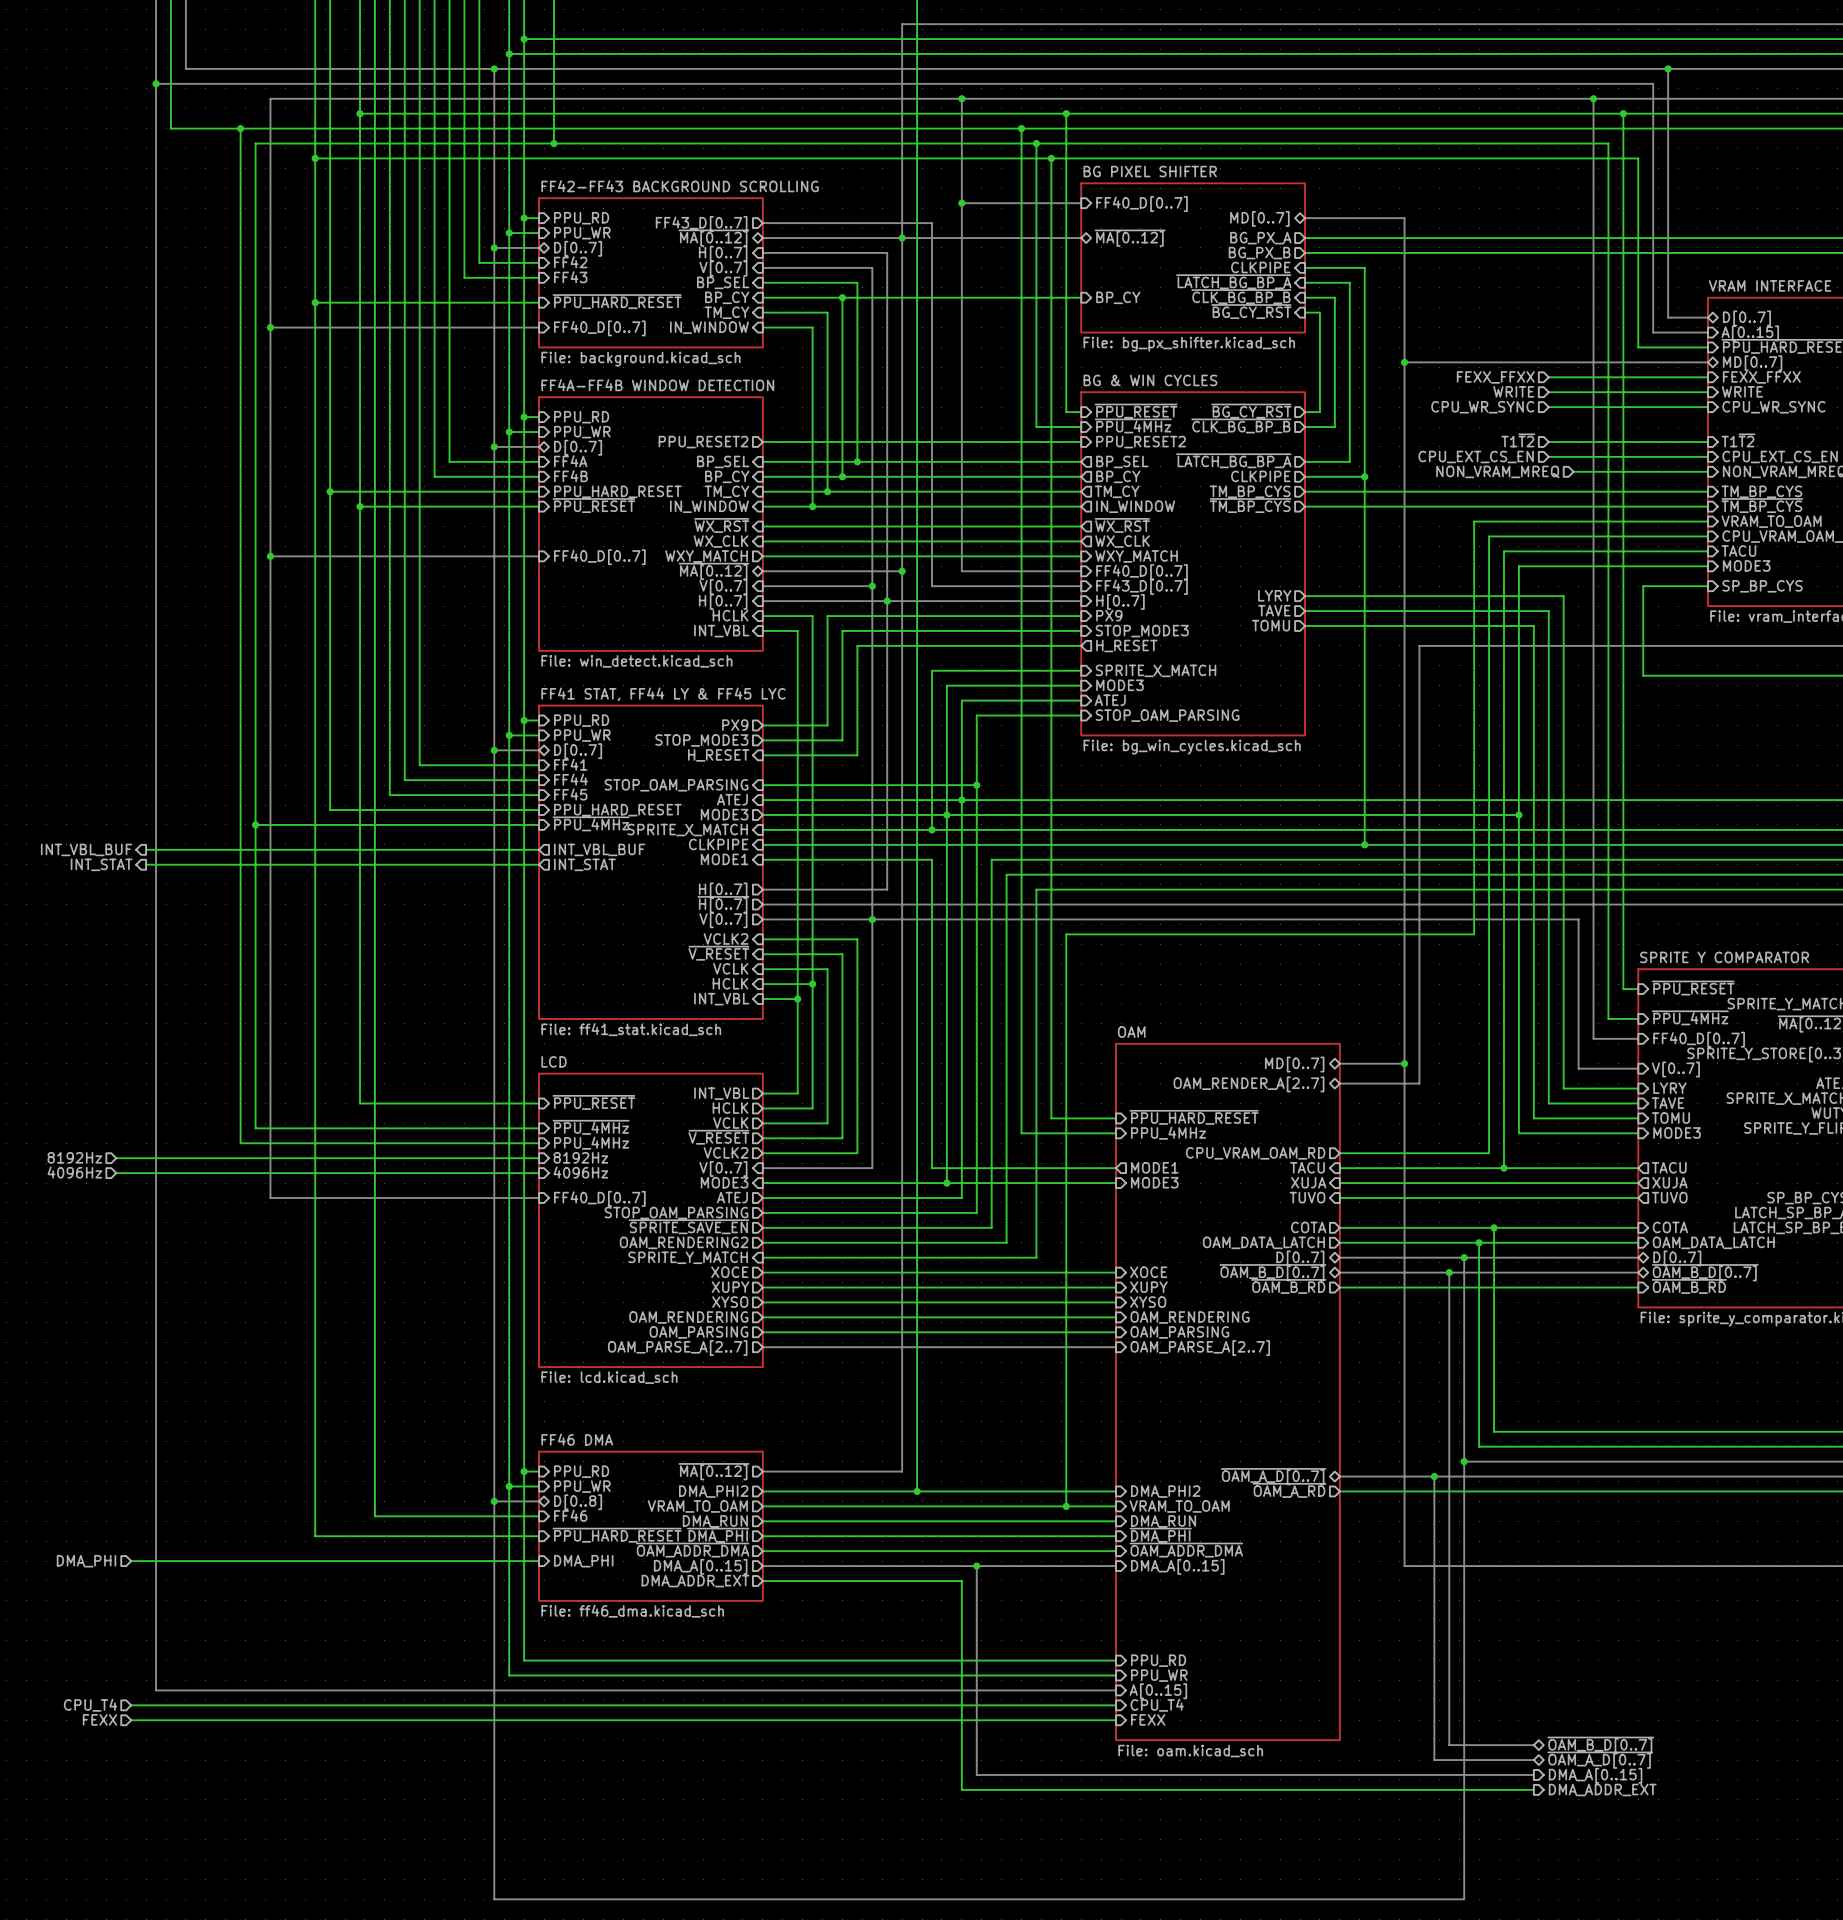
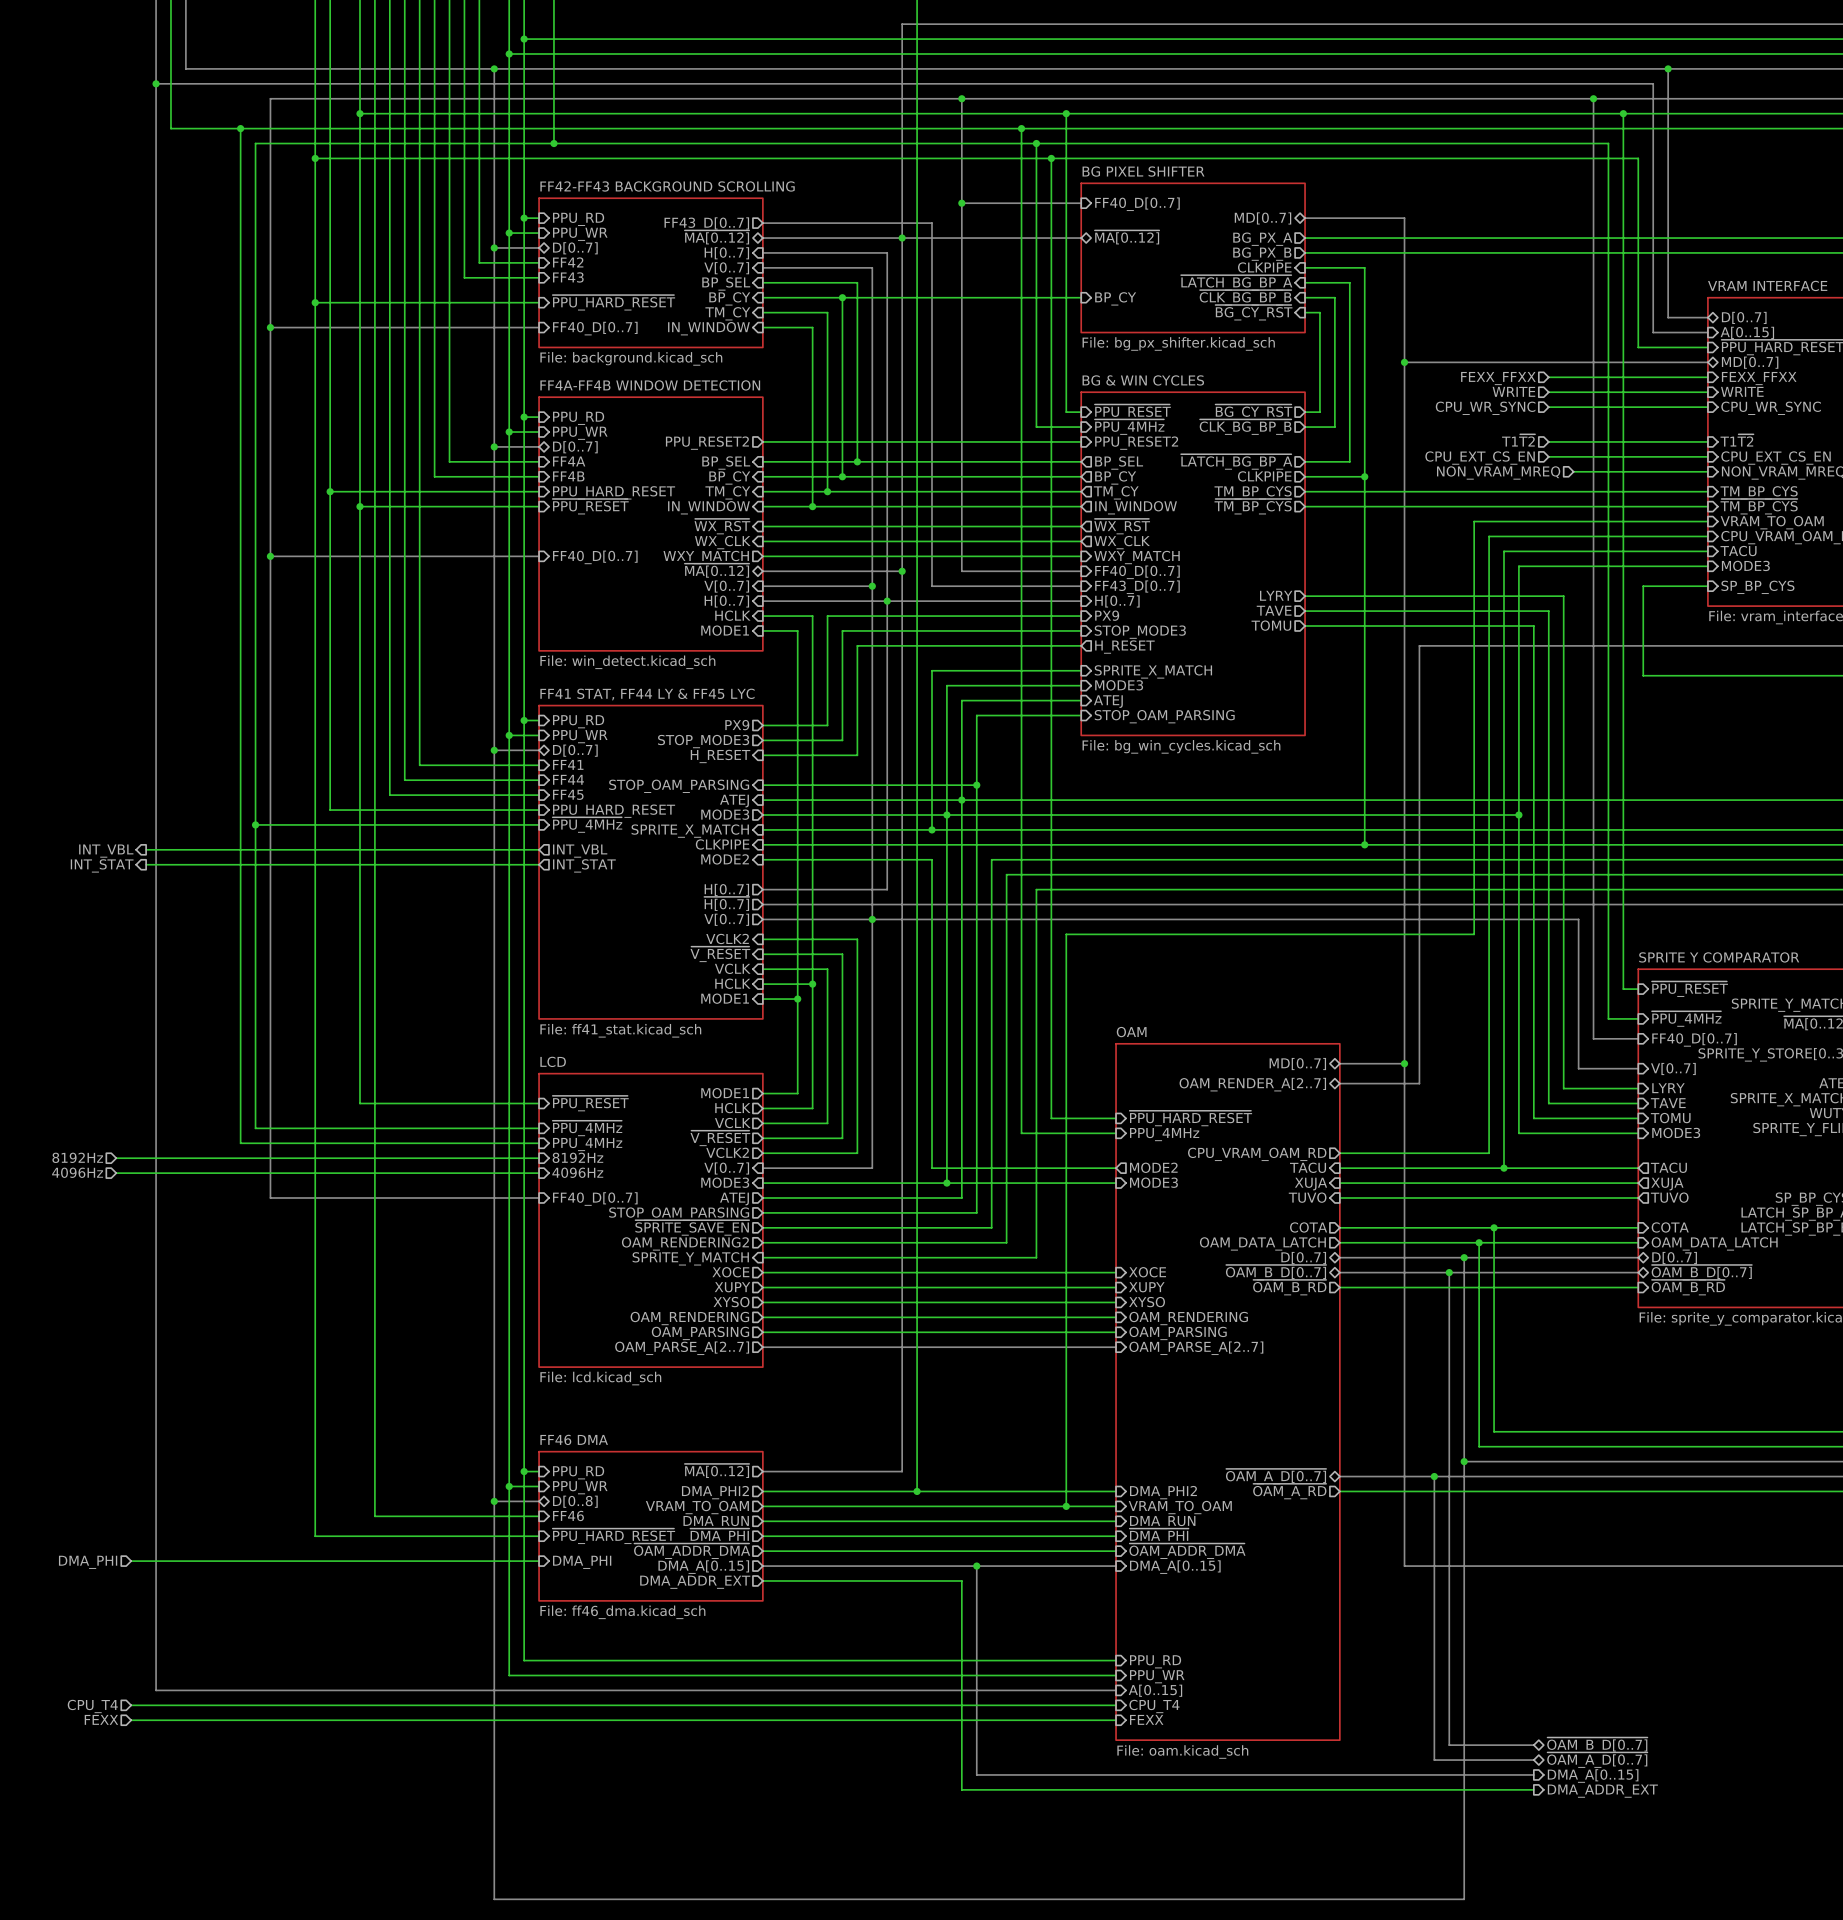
sheet pin: INT_VBL (721, 631) -> MODE1 (725, 630)
hierarchical label: INT_VBL_BUF (86, 849) -> INT_VBL (106, 851)
sheet pin: INT_VBL_BUF (599, 849) -> INT_VBL (580, 851)
sheet pin: MODE1 (724, 859) -> MODE2 (725, 859)
sheet pin: INT_VBL (721, 999) -> MODE1 (725, 998)
sheet pin: INT_VBL (721, 1093) -> MODE1 (725, 1093)
sheet pin: MODE1 (1154, 1167) -> MODE2 (1153, 1167)

